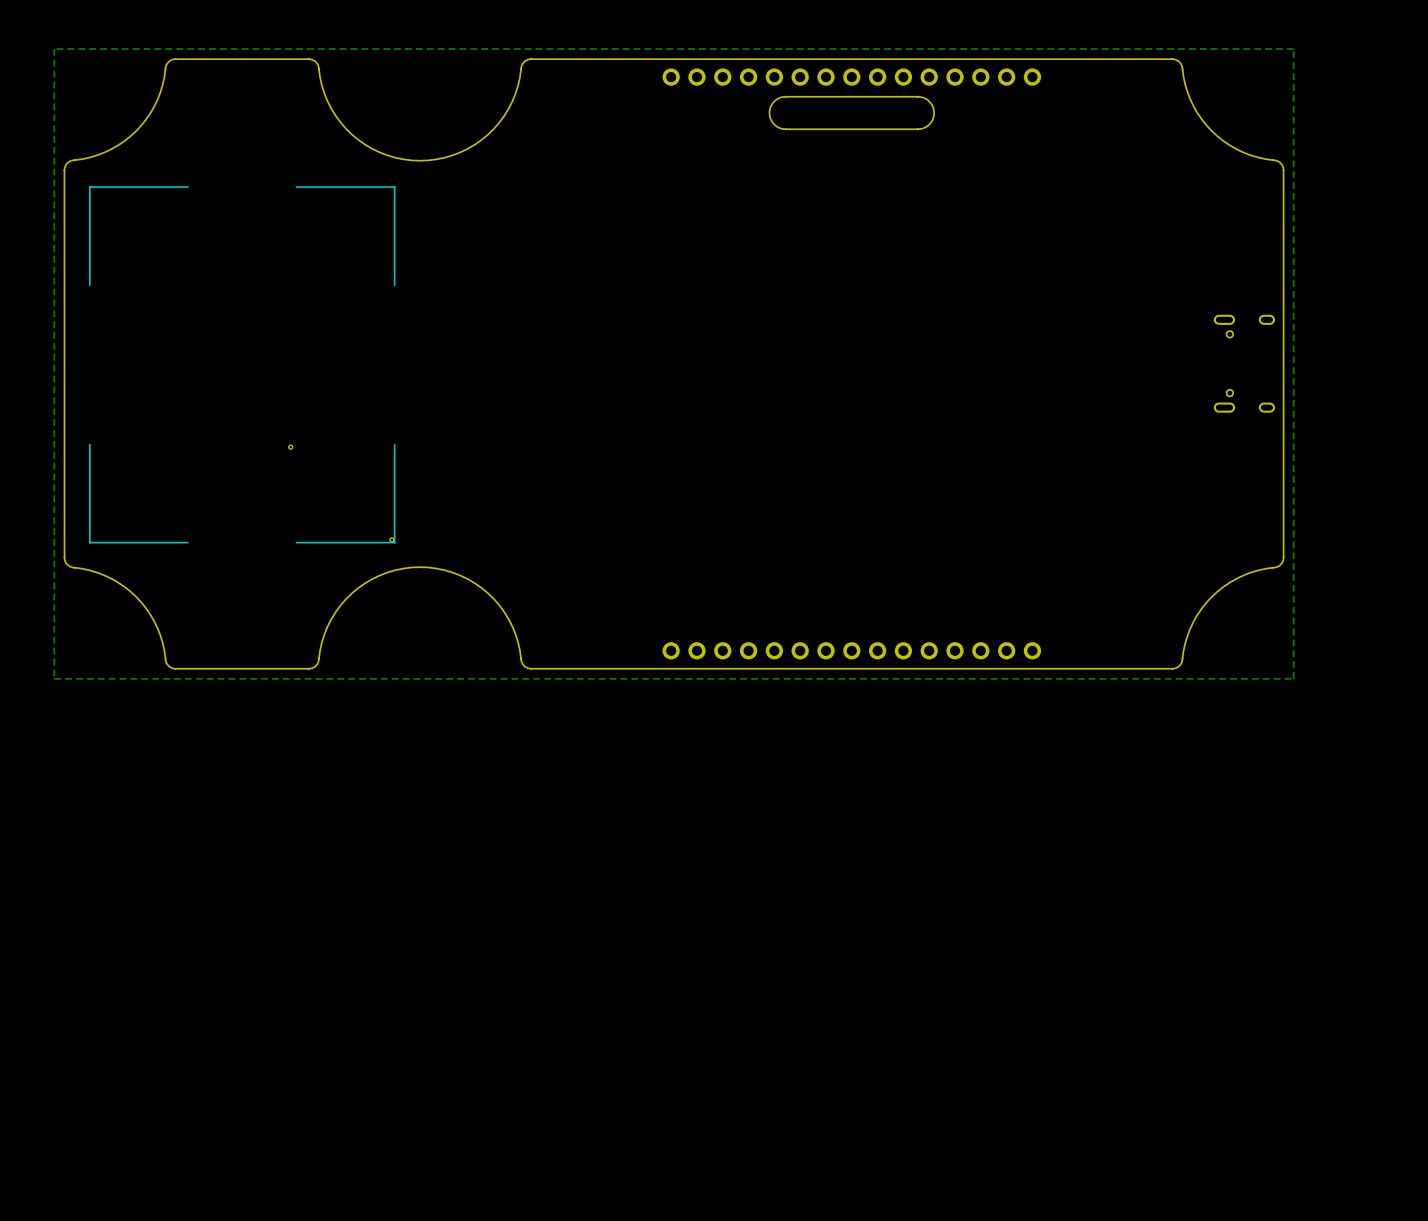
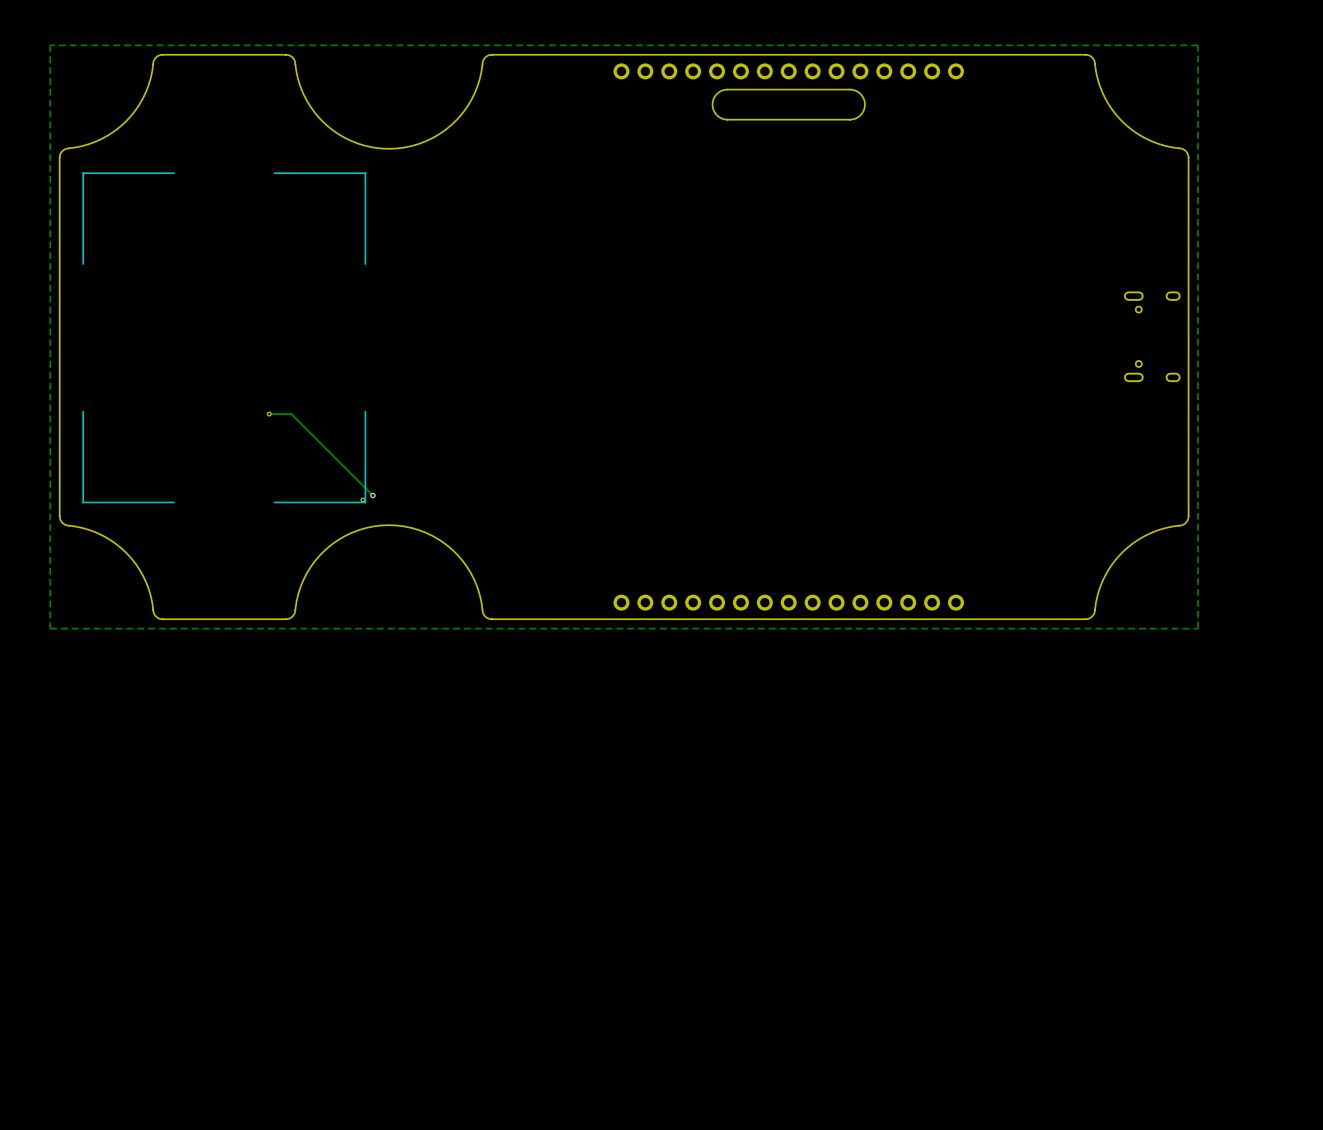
track: none -> (269, 414) (291, 414) (372, 495)
via: none -> (372, 495)

